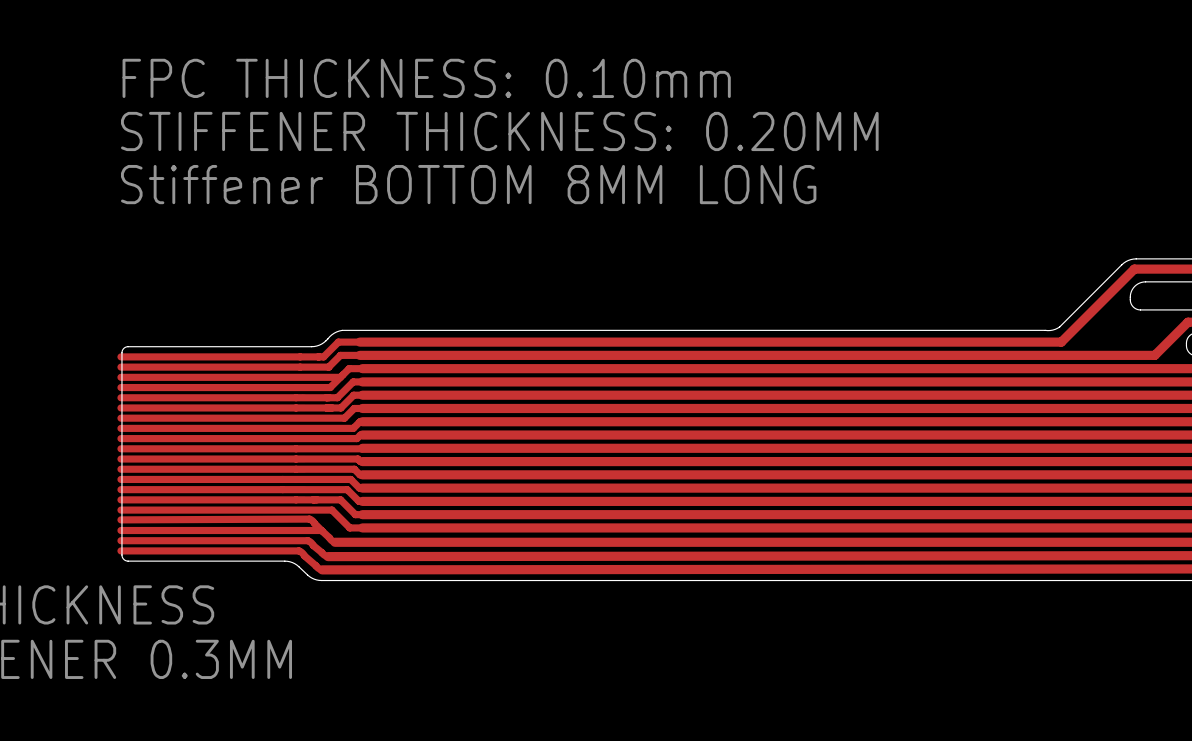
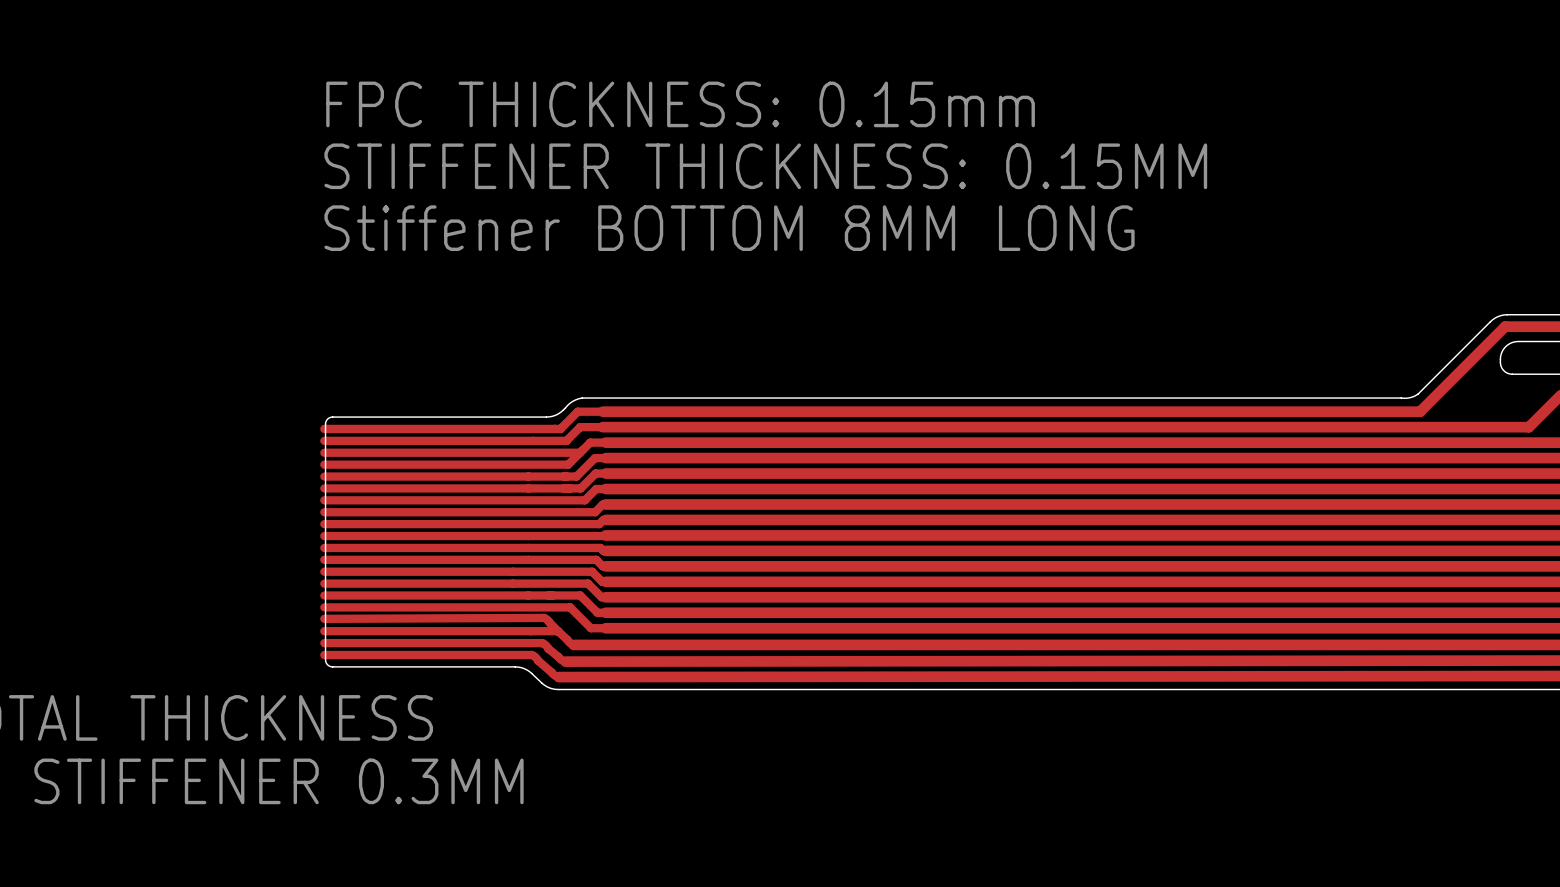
text: FPC THICKNESS: 0.10mm (426, 78) -> FPC THICKNESS: 0.15mm (680, 104)
text: STIFFENER THICKNESS: 0.20MM (499, 131) -> STIFFENER THICKNESS: 0.15MM (765, 166)

